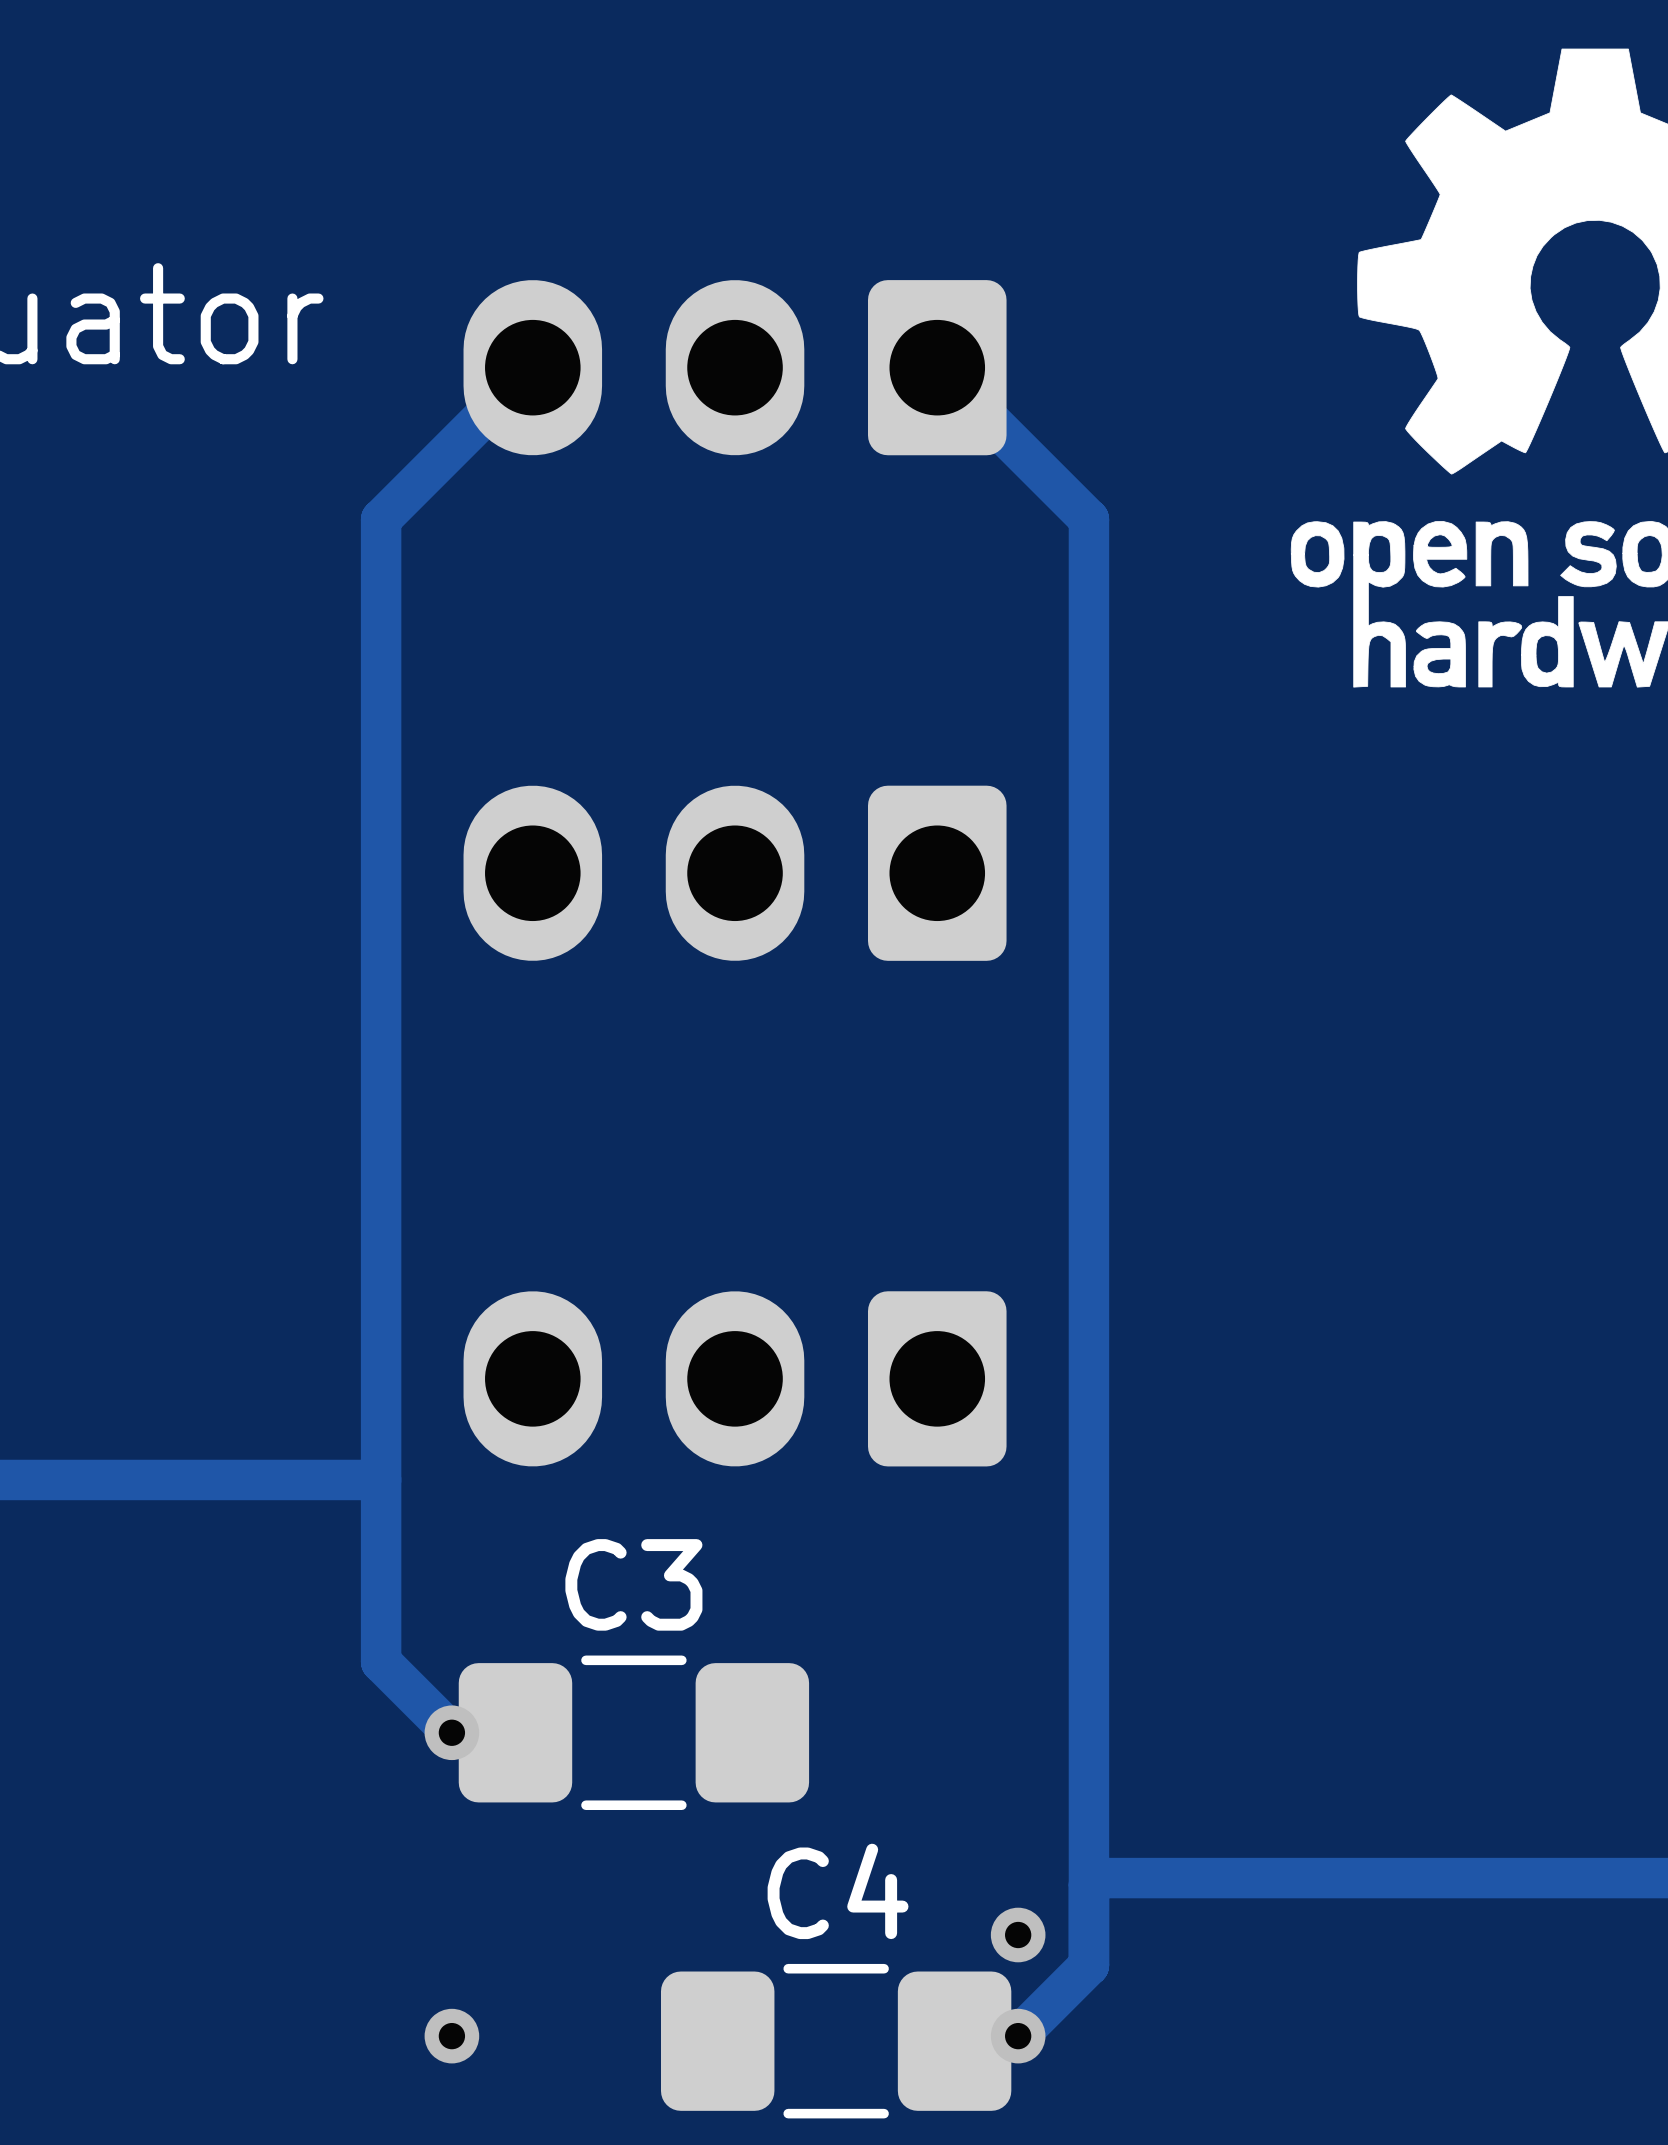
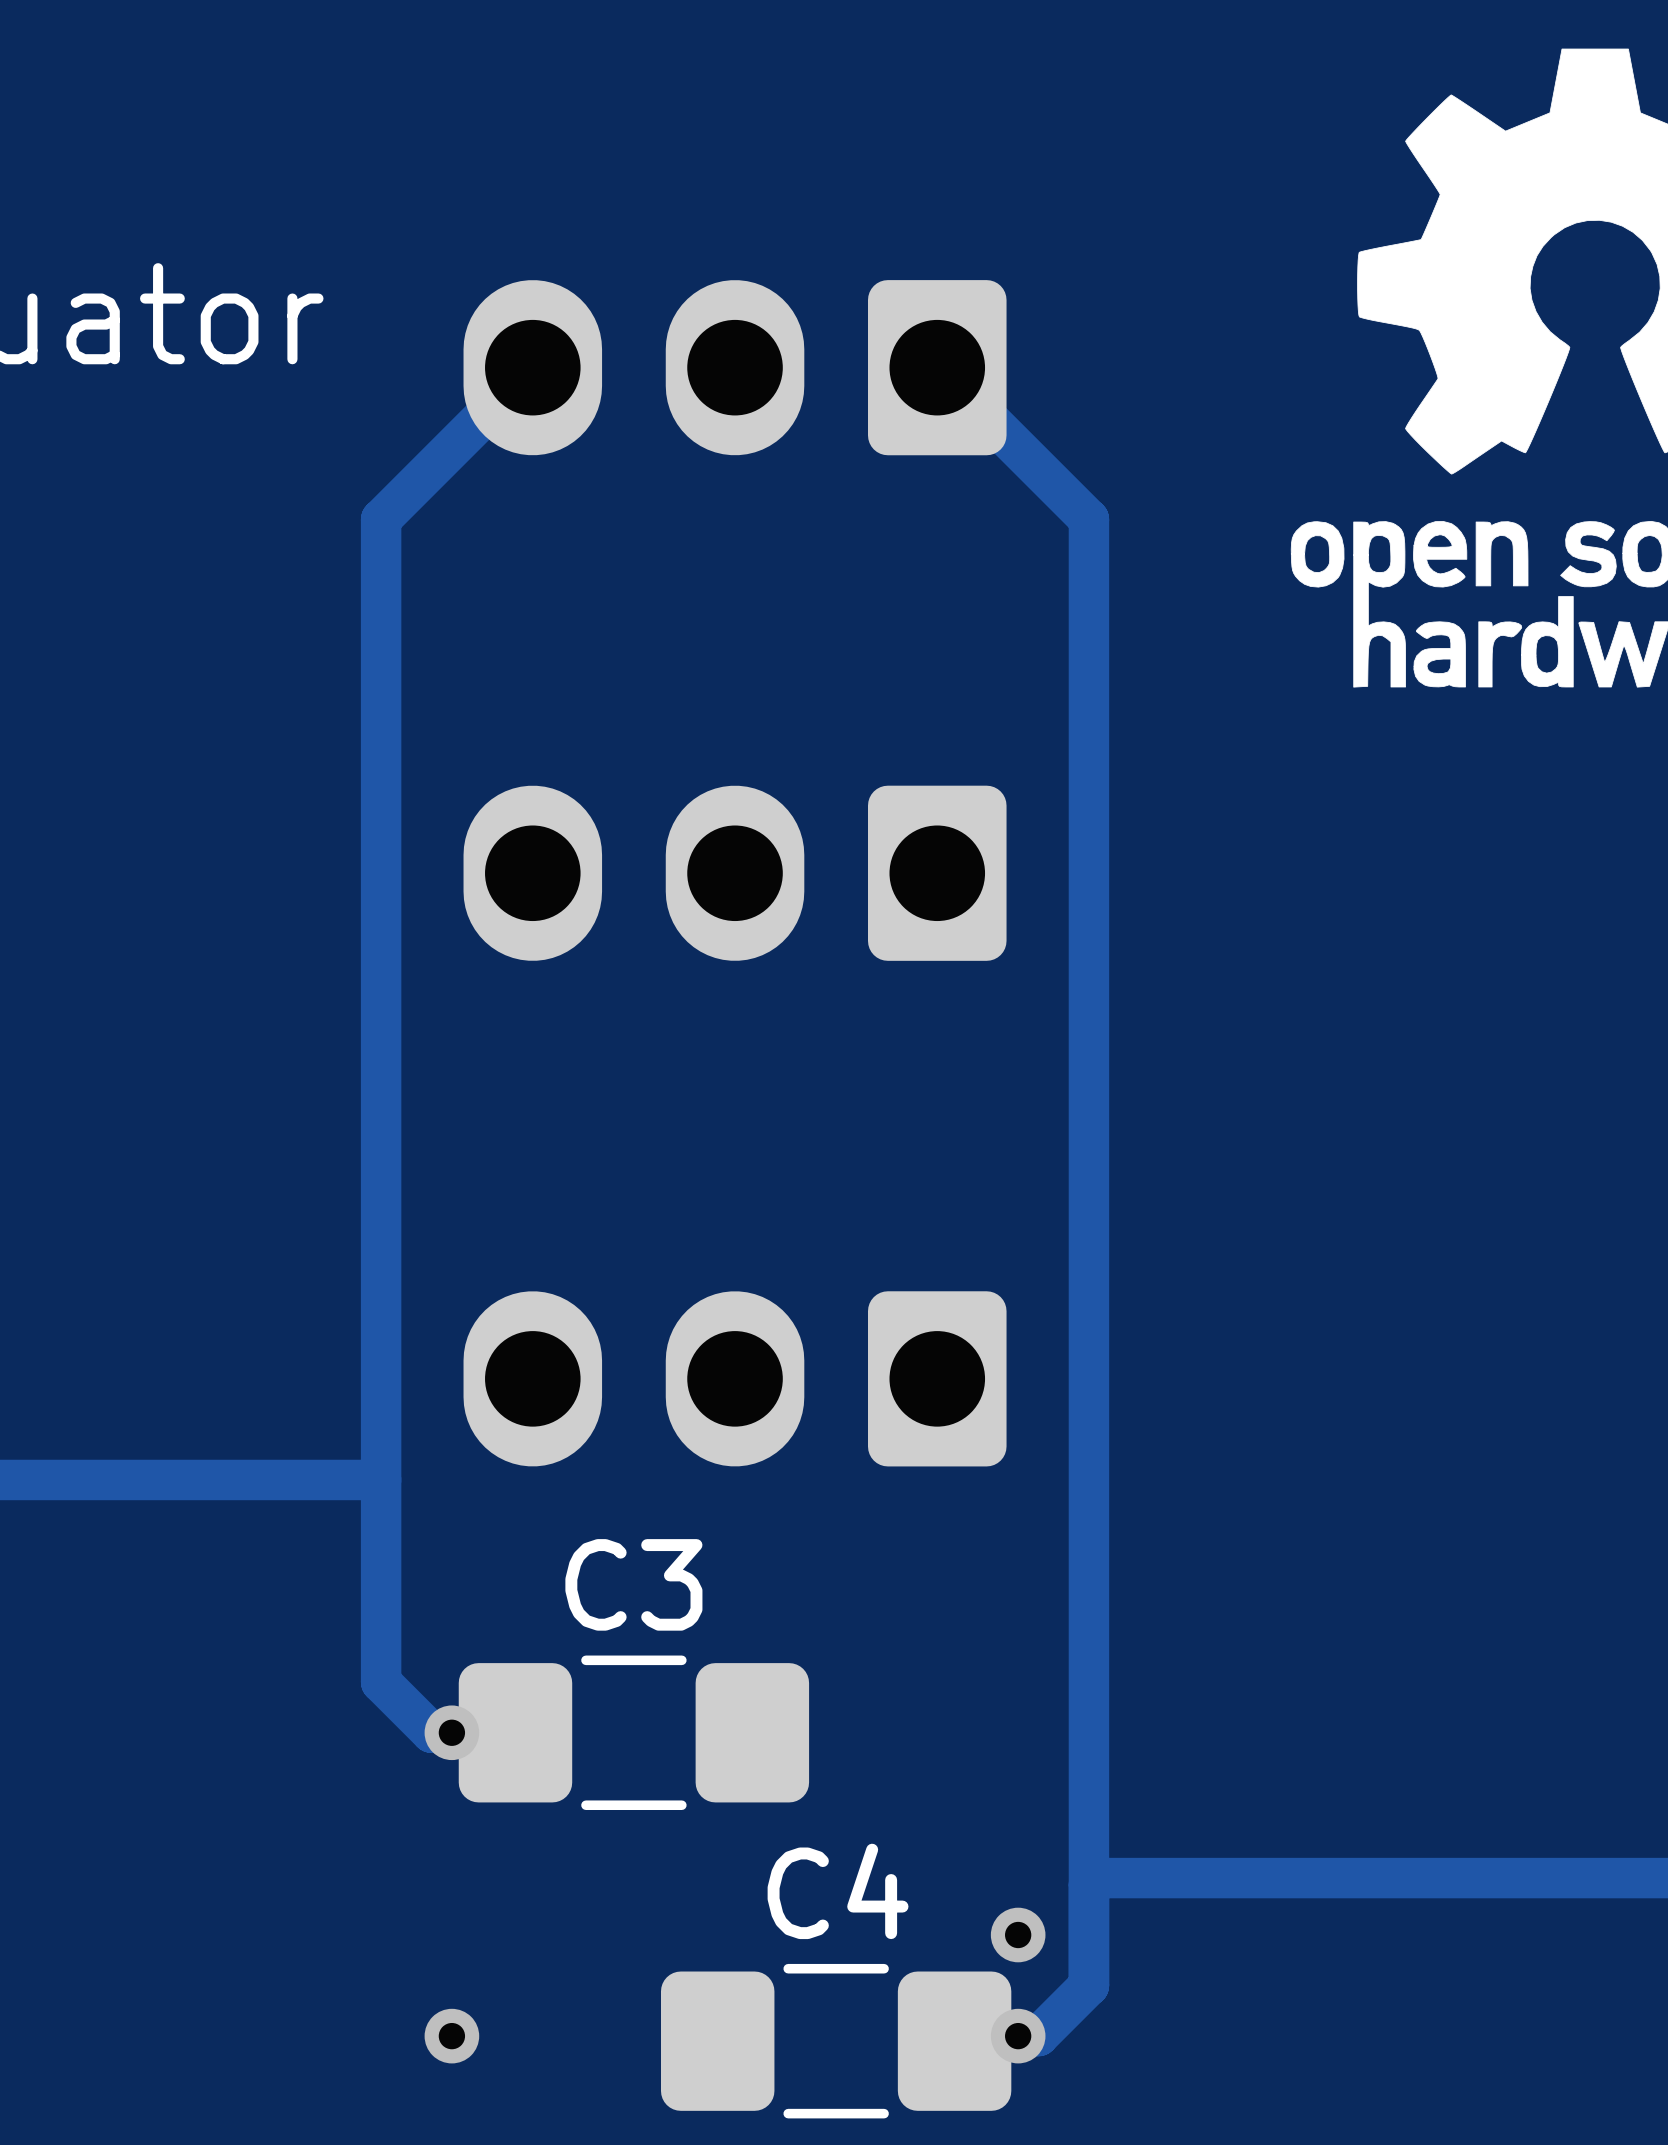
track: (381, 1661) (451, 1732) -> (381, 1661) (381, 1682) (431, 1732) (451, 1732)
track: (1088, 1965) (1018, 2036) -> (1088, 1965) (1088, 1985) (1038, 2036) (1018, 2036)

